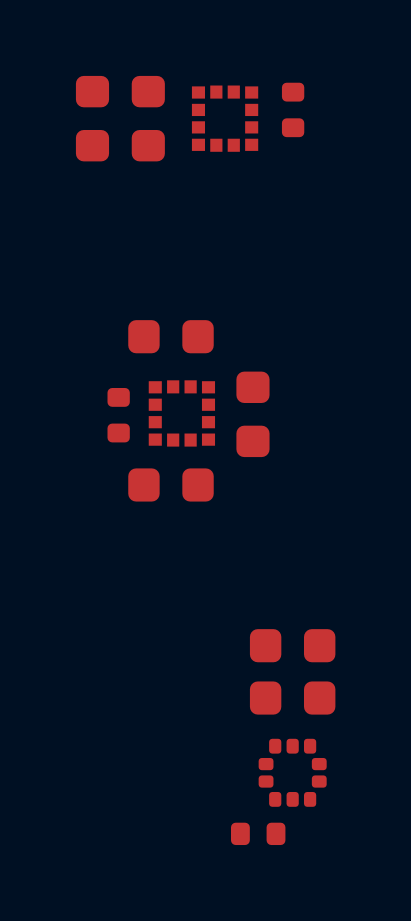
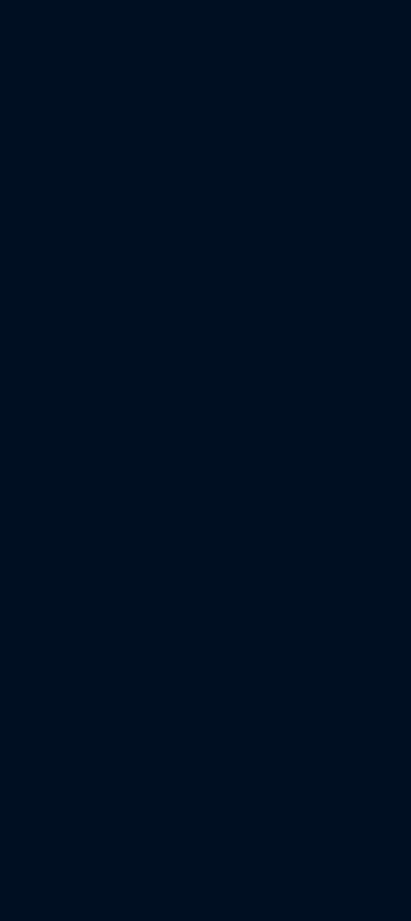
part: (293, 109) -> none
part: (92, 118) -> none
part: (148, 118) -> none
part: (225, 118) -> none
part: (170, 336) -> none
part: (181, 413) -> none
part: (252, 414) -> none
part: (118, 415) -> none
part: (170, 484) -> none
part: (292, 645) -> none
part: (292, 698) -> none
part: (292, 772) -> none
part: (258, 833) -> none

